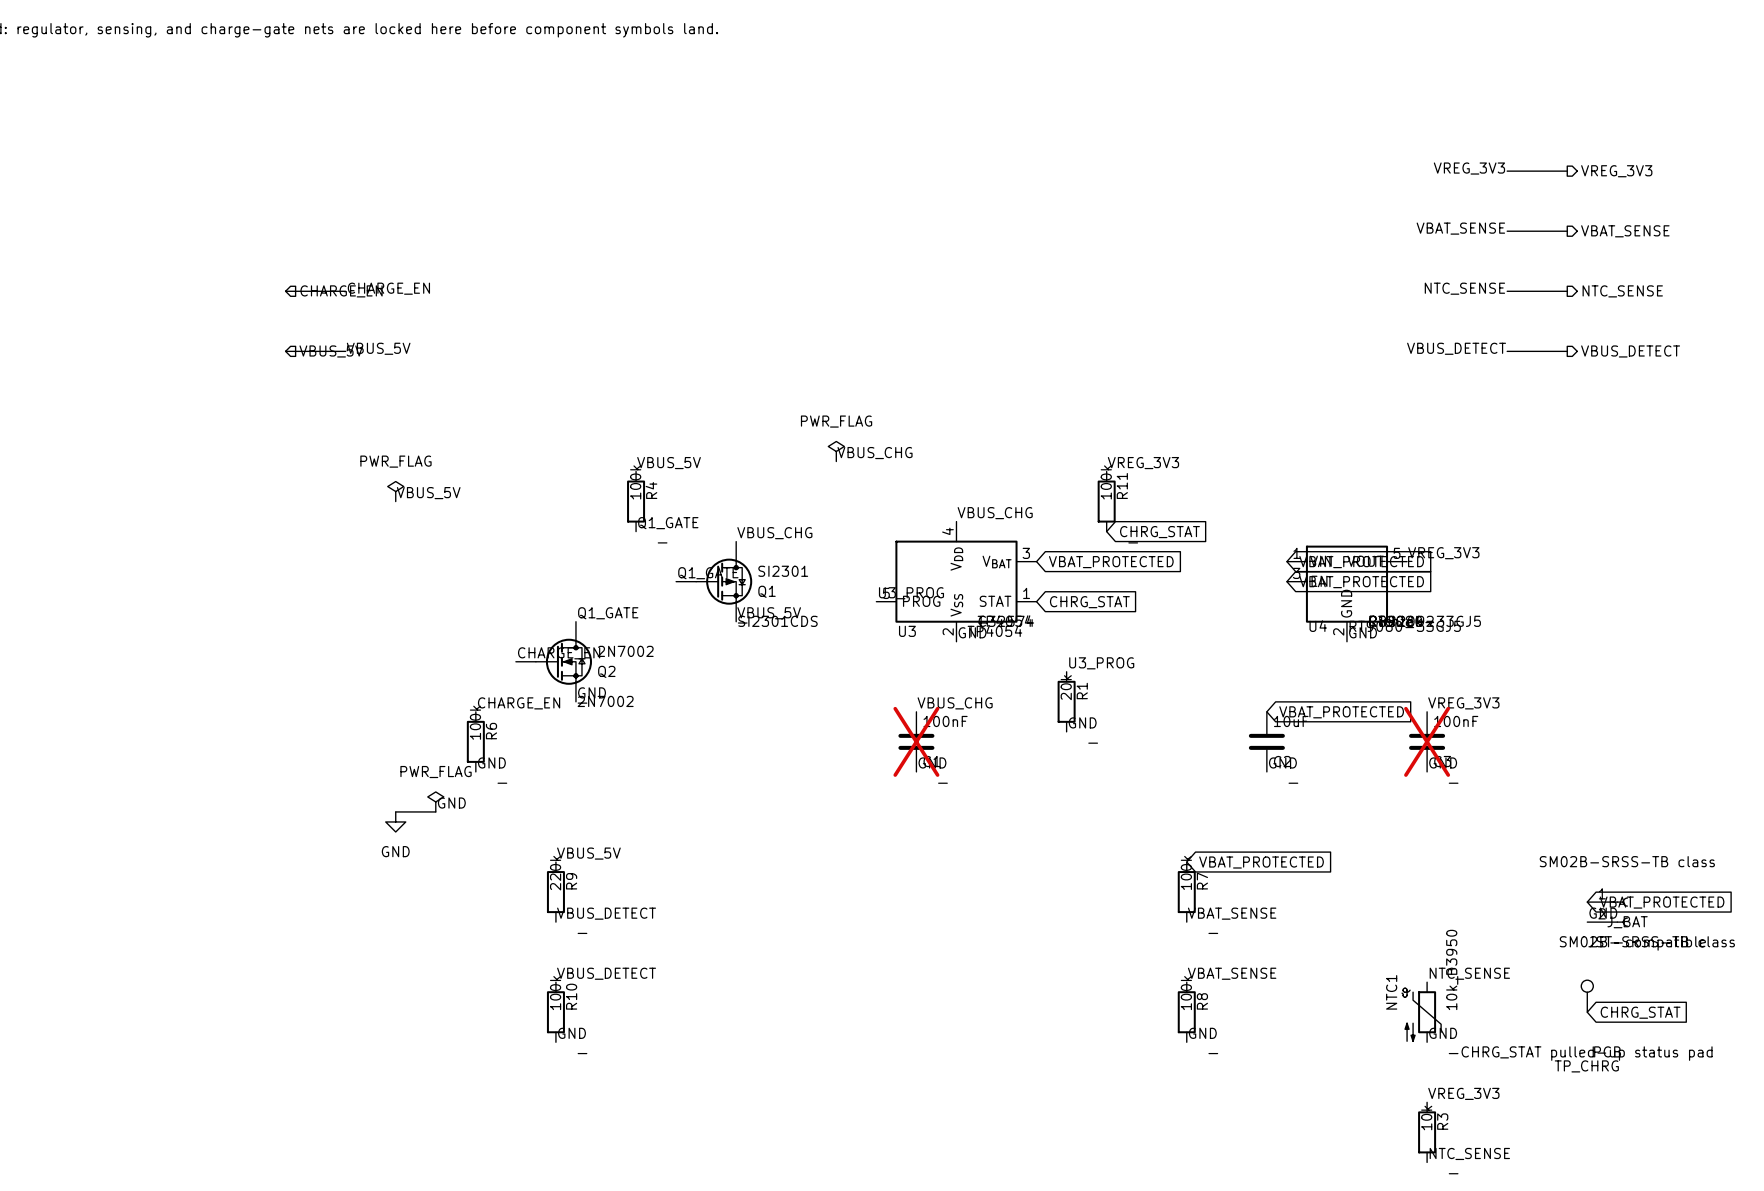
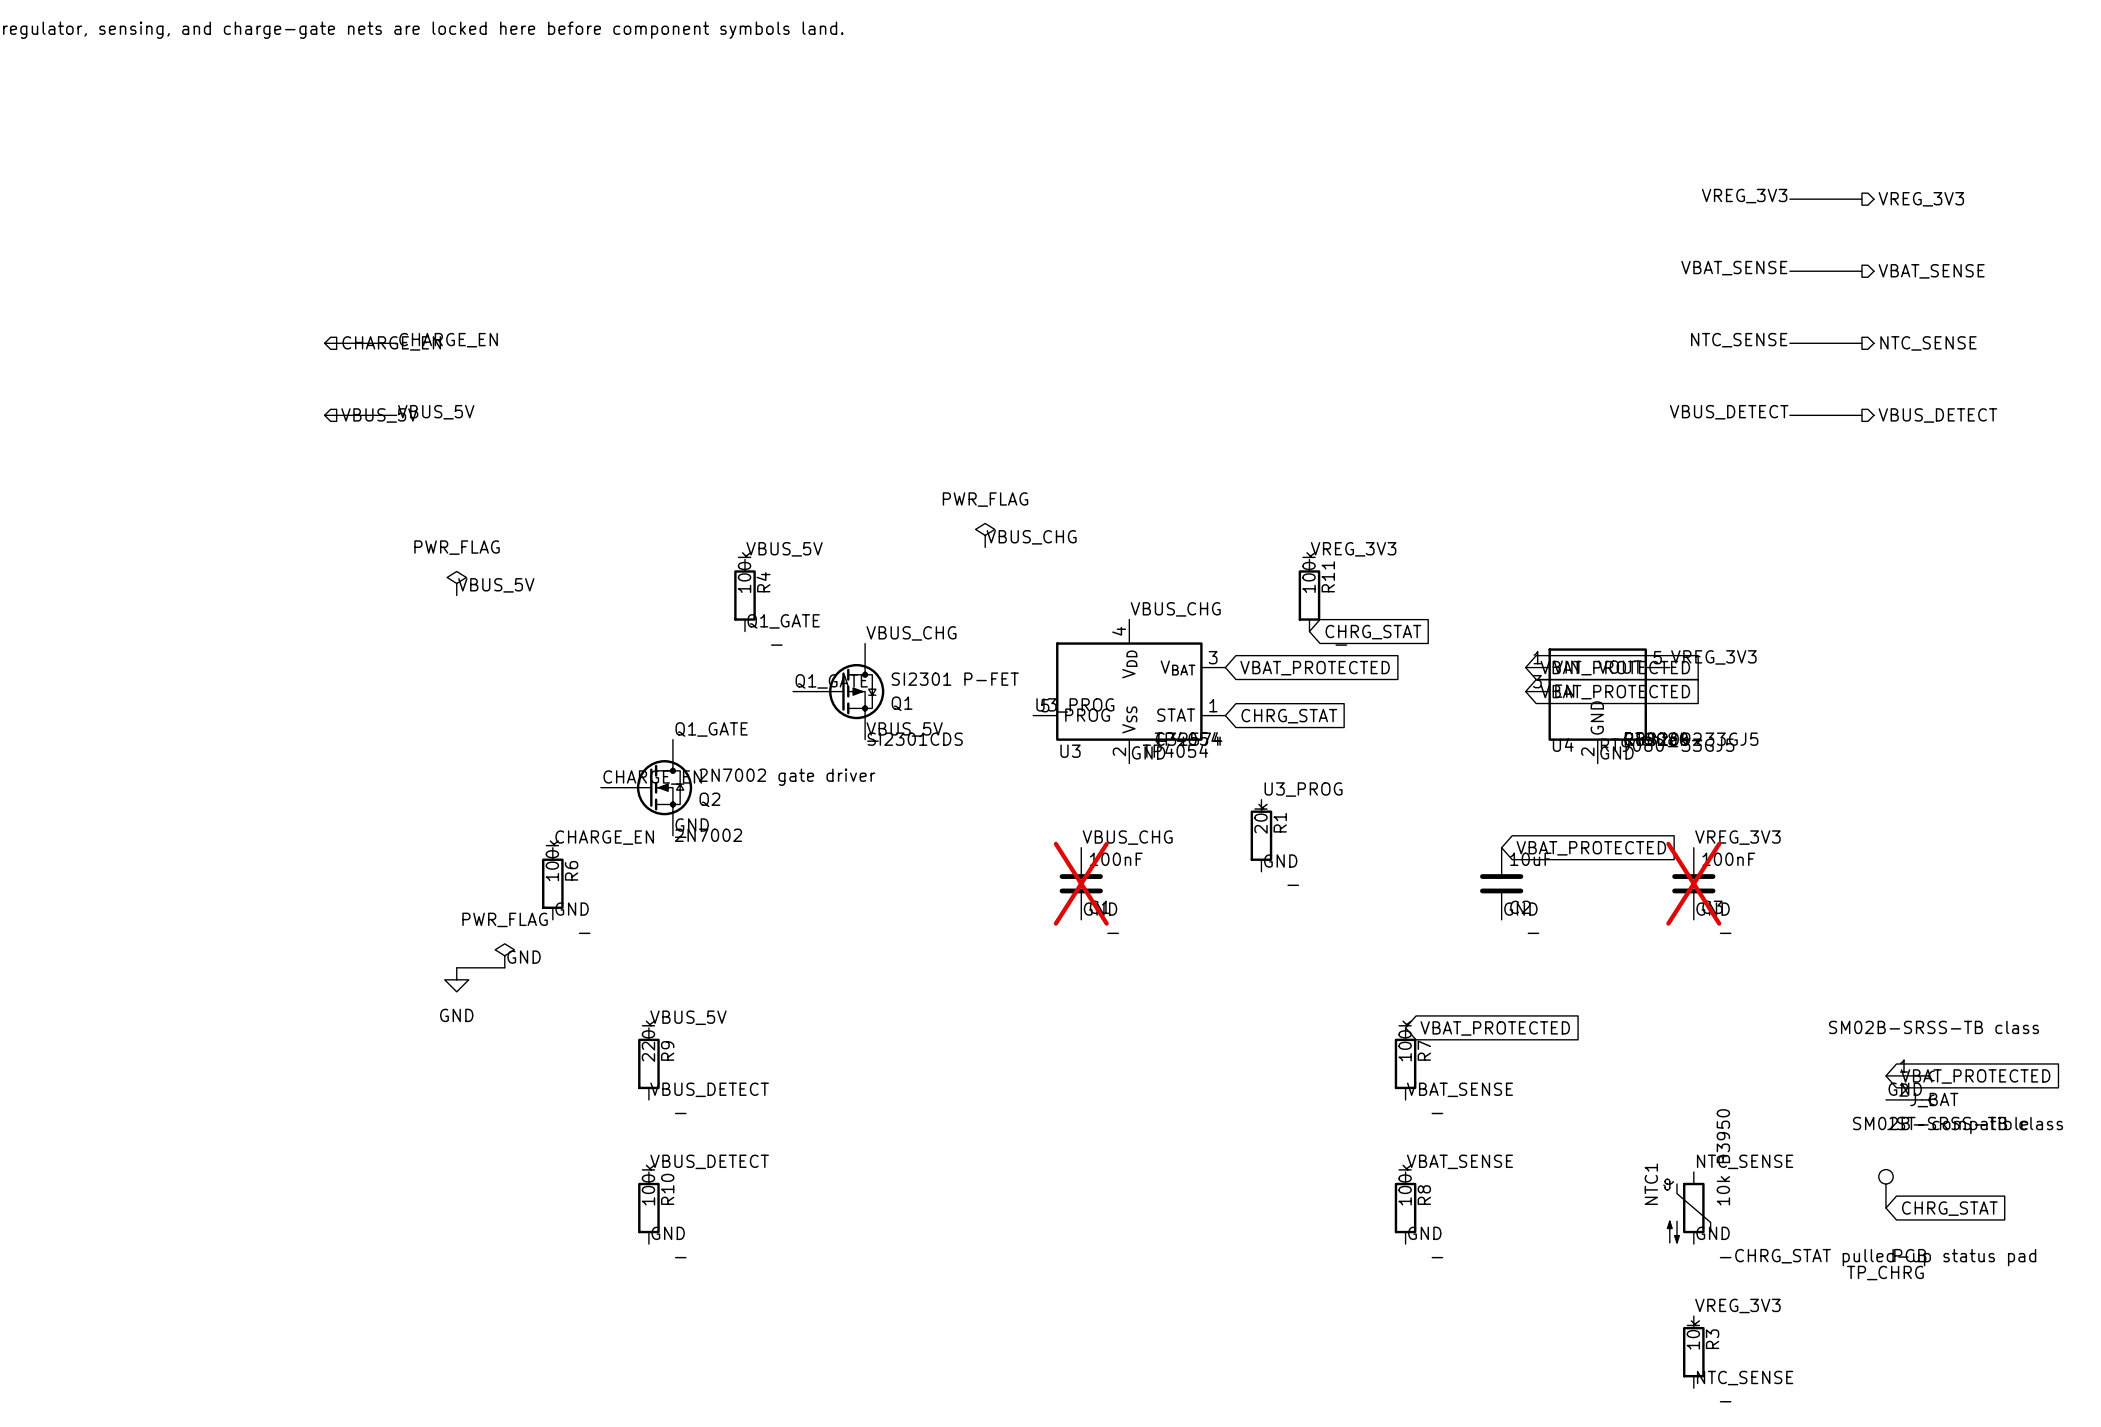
Q1 value: SI2301 (783, 571) -> SI2301 P-FET (955, 679)
Q2 value: 2N7002 (625, 651) -> 2N7002 gate driver (787, 777)
NTC1 value: 10k_B3950 (1452, 969) -> 10k B3950 (1723, 1157)

